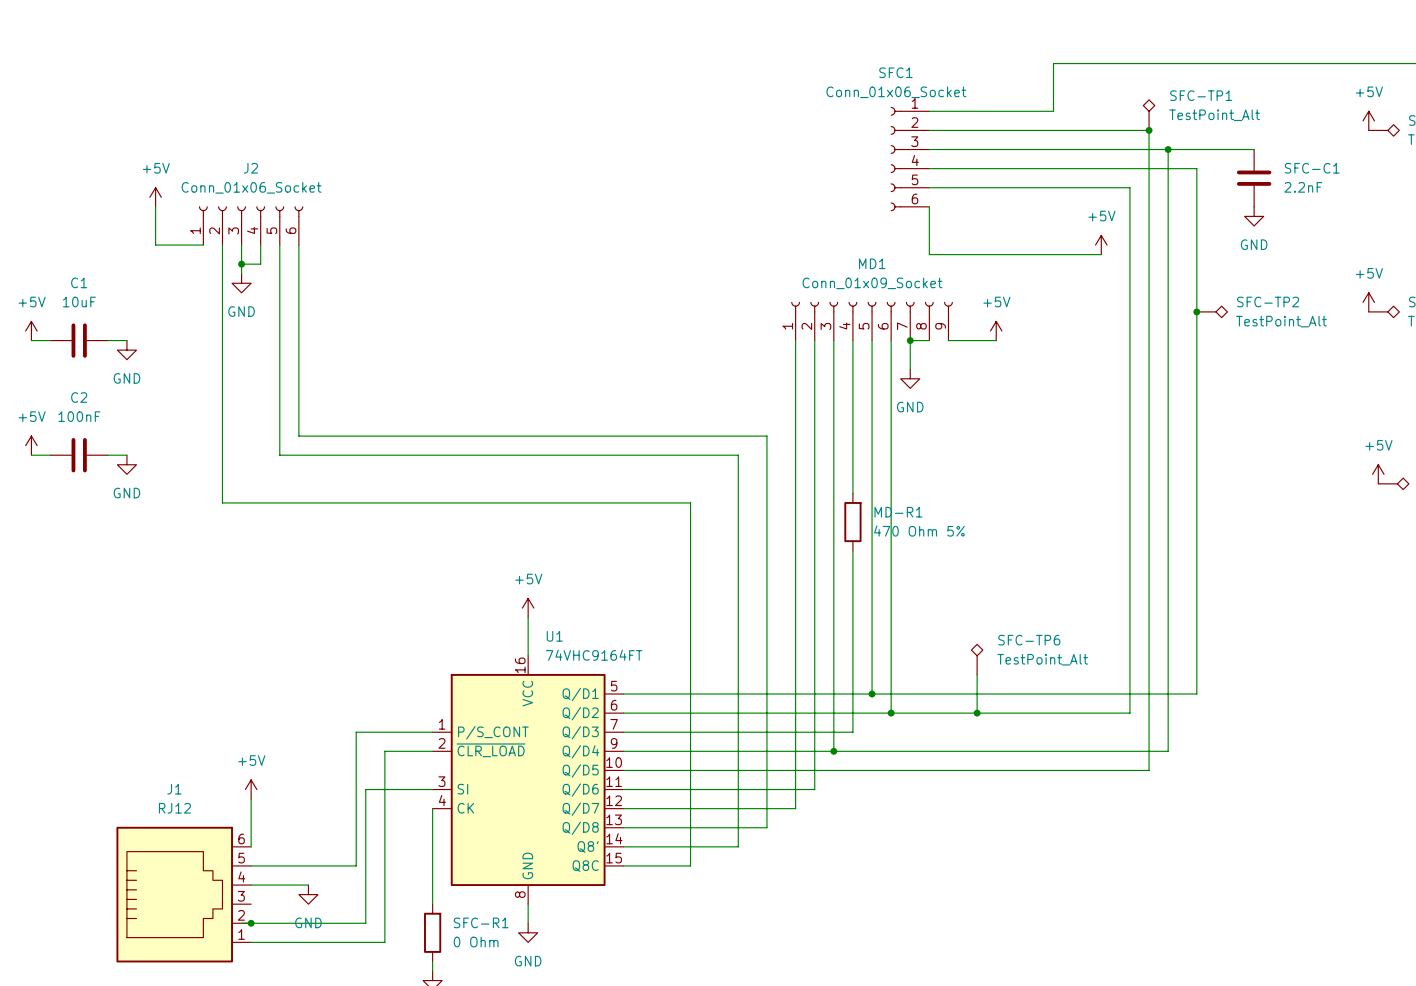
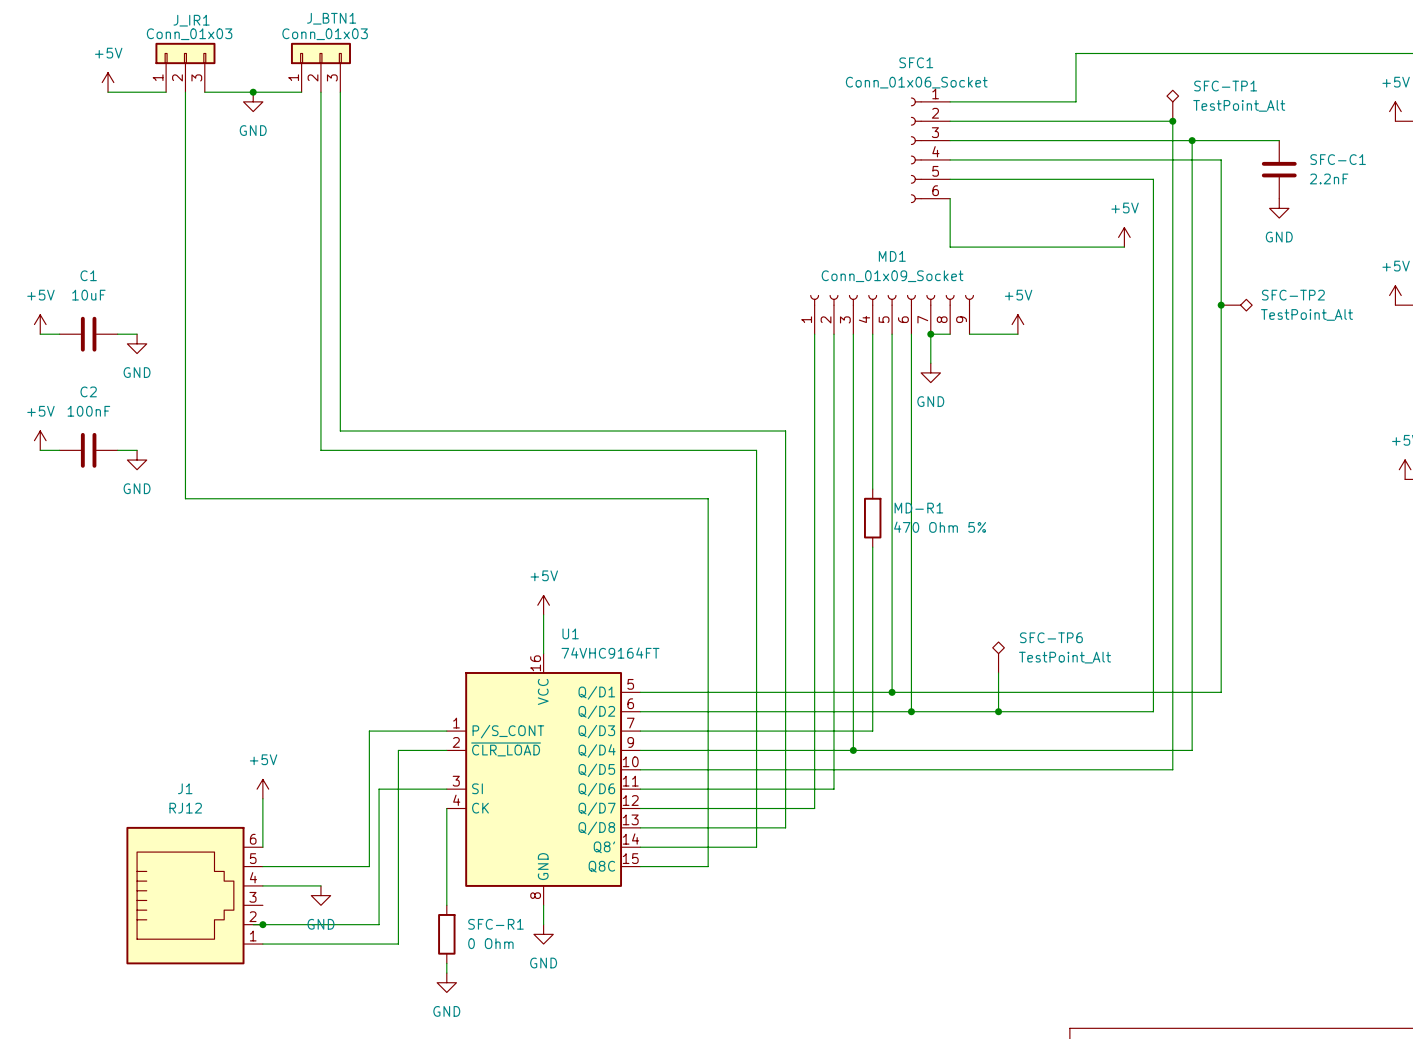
J_IR1: none -> Conn_01x03 (185, 67)
J_BTN1: none -> Conn_01x03 (320, 67)
wire: none -> (108, 92) (166, 92)
wire: none -> (204, 92) (301, 92)
junction: none -> (253, 92)
power symbol position: +5V (155, 197) -> +5V (108, 82)
wire: (155, 206) (155, 245) (203, 245) -> none
J2: Conn_01x06_Socket (251, 225) -> none
wire: (222, 245) (222, 502) -> (185, 92) (185, 498) (233, 498)
wire: (241, 245) (241, 273) -> none
wire: (260, 245) (260, 264) (241, 264) -> none
wire: (279, 245) (279, 455) (308, 455) -> (320, 92) (320, 450)
wire: (298, 245) (298, 436) (327, 436) -> (340, 92) (340, 431)
junction: (241, 264) -> none
power symbol position: GND (241, 283) -> GND (253, 101)

